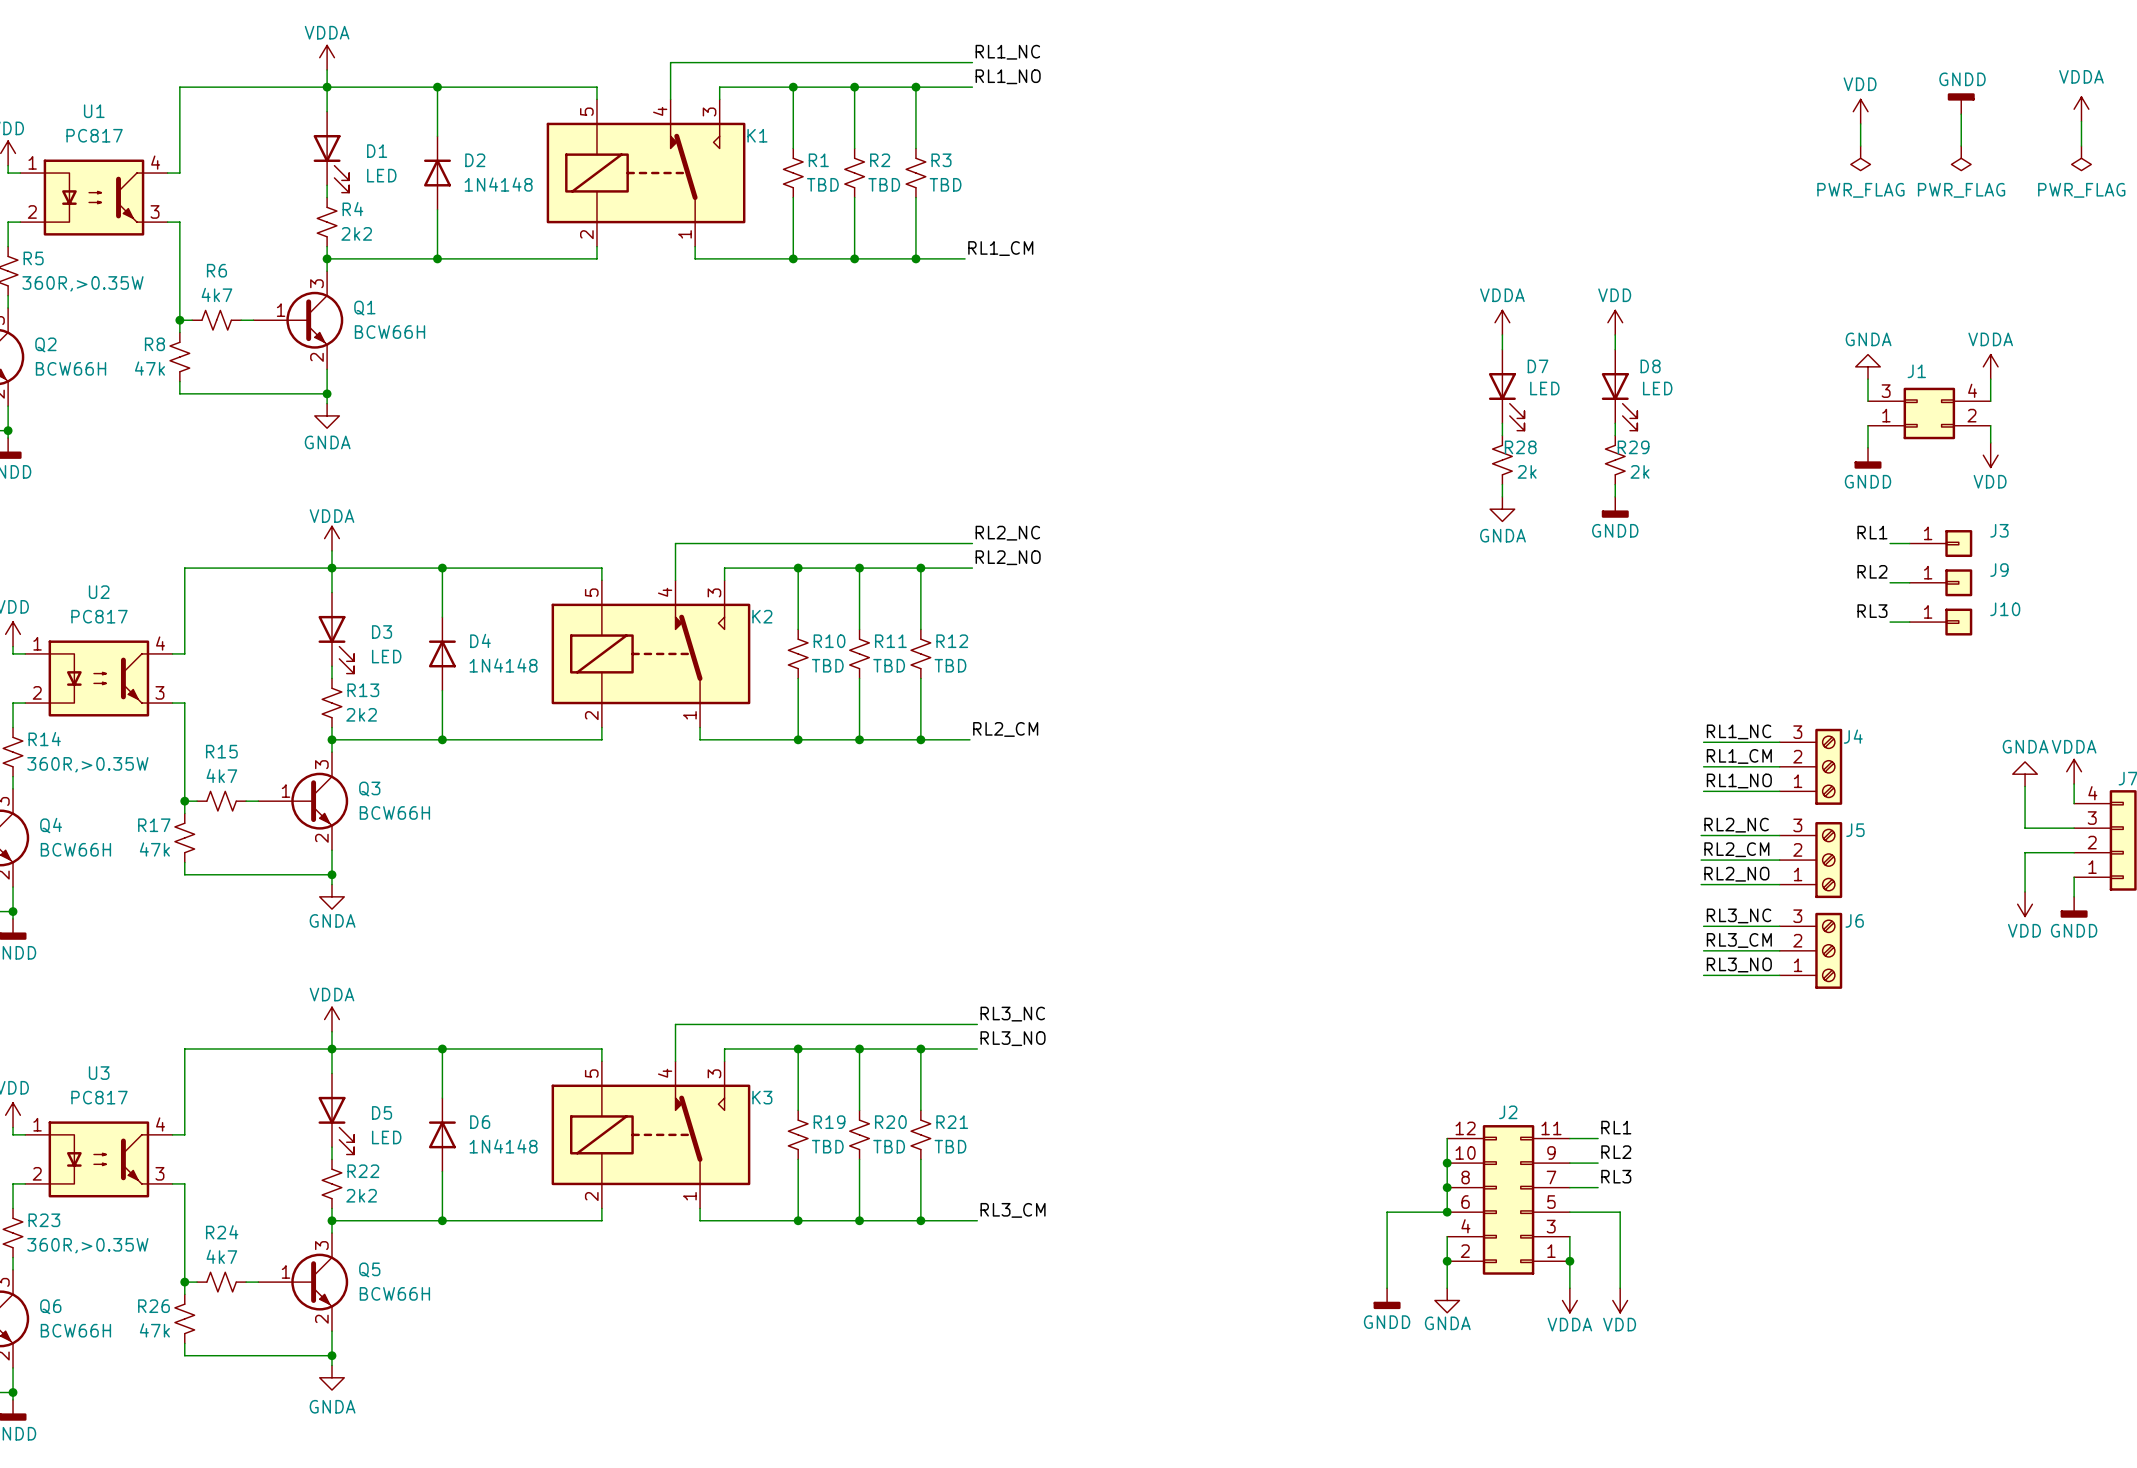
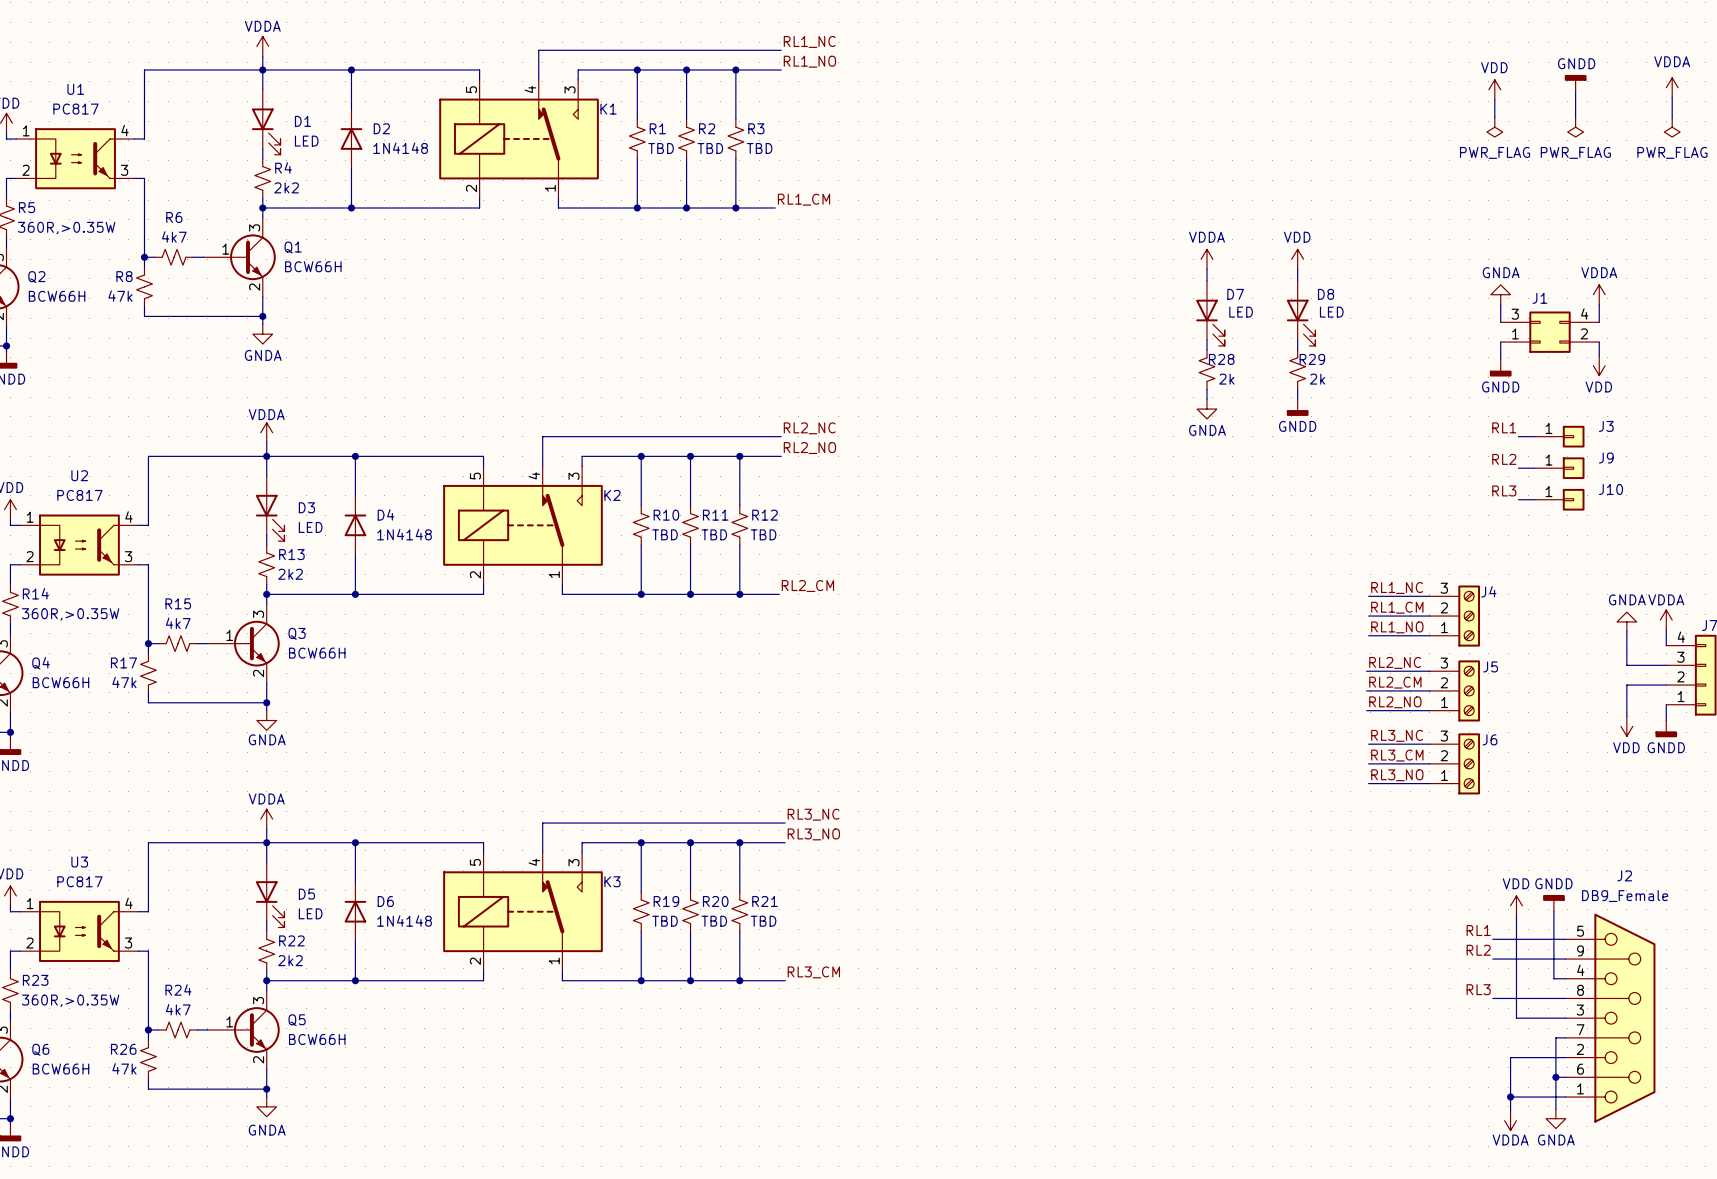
J2 name position: J2 (1508, 1112) -> J2 (1624, 875)
J2 value: none -> DB9_Female (1625, 896)
power symbol: none -> GNDD (1553, 903)
J2 symbol: [1447, 1125, 1570, 1275] -> [1565, 913, 1656, 1123]
label: RL1 (1616, 1127) -> none
power symbol: none -> VDD (1516, 905)
wire: none -> (1553, 911) (1553, 978) (1565, 978)
wire: (1447, 1138) (1447, 1212) (1387, 1212) (1387, 1288) -> none
wire: (1569, 1138) (1598, 1138) -> none
wire: none -> (1516, 915) (1516, 1018) (1565, 1018)
label: RL2 (1616, 1152) -> none
label: none -> RL1 (1478, 930)
junction: (1447, 1163) -> none
wire: (1569, 1163) (1598, 1163) -> none
wire: none -> (1492, 939) (1565, 939)
label: RL3 (1616, 1176) -> none
label: none -> RL2 (1478, 950)
junction: (1447, 1187) -> none
wire: (1569, 1187) (1598, 1187) -> none
wire: none -> (1492, 959) (1565, 959)
junction: (1447, 1212) -> none
wire: (1569, 1212) (1620, 1212) (1620, 1288) -> none
label: none -> RL3 (1478, 989)
wire: (1447, 1236) (1447, 1288) -> none
wire: (1569, 1236) (1569, 1288) -> none
wire: none -> (1492, 998) (1565, 998)
junction: (1447, 1261) -> none
junction: (1569, 1261) -> none
wire: none -> (1565, 1037) (1555, 1037) (1555, 1108)
power symbol: GNDD (1387, 1298) -> none
power symbol: GNDA (1447, 1300) -> none
power symbol: VDDA (1569, 1300) -> none
power symbol: VDD (1620, 1300) -> none
wire: none -> (1565, 1057) (1510, 1057) (1510, 1110)
wire: none -> (1555, 1077) (1565, 1077)
junction: none -> (1555, 1077)
wire: none -> (1510, 1097) (1565, 1097)
junction: none -> (1510, 1097)
power symbol: none -> GNDA (1555, 1118)
power symbol: none -> VDDA (1510, 1120)

